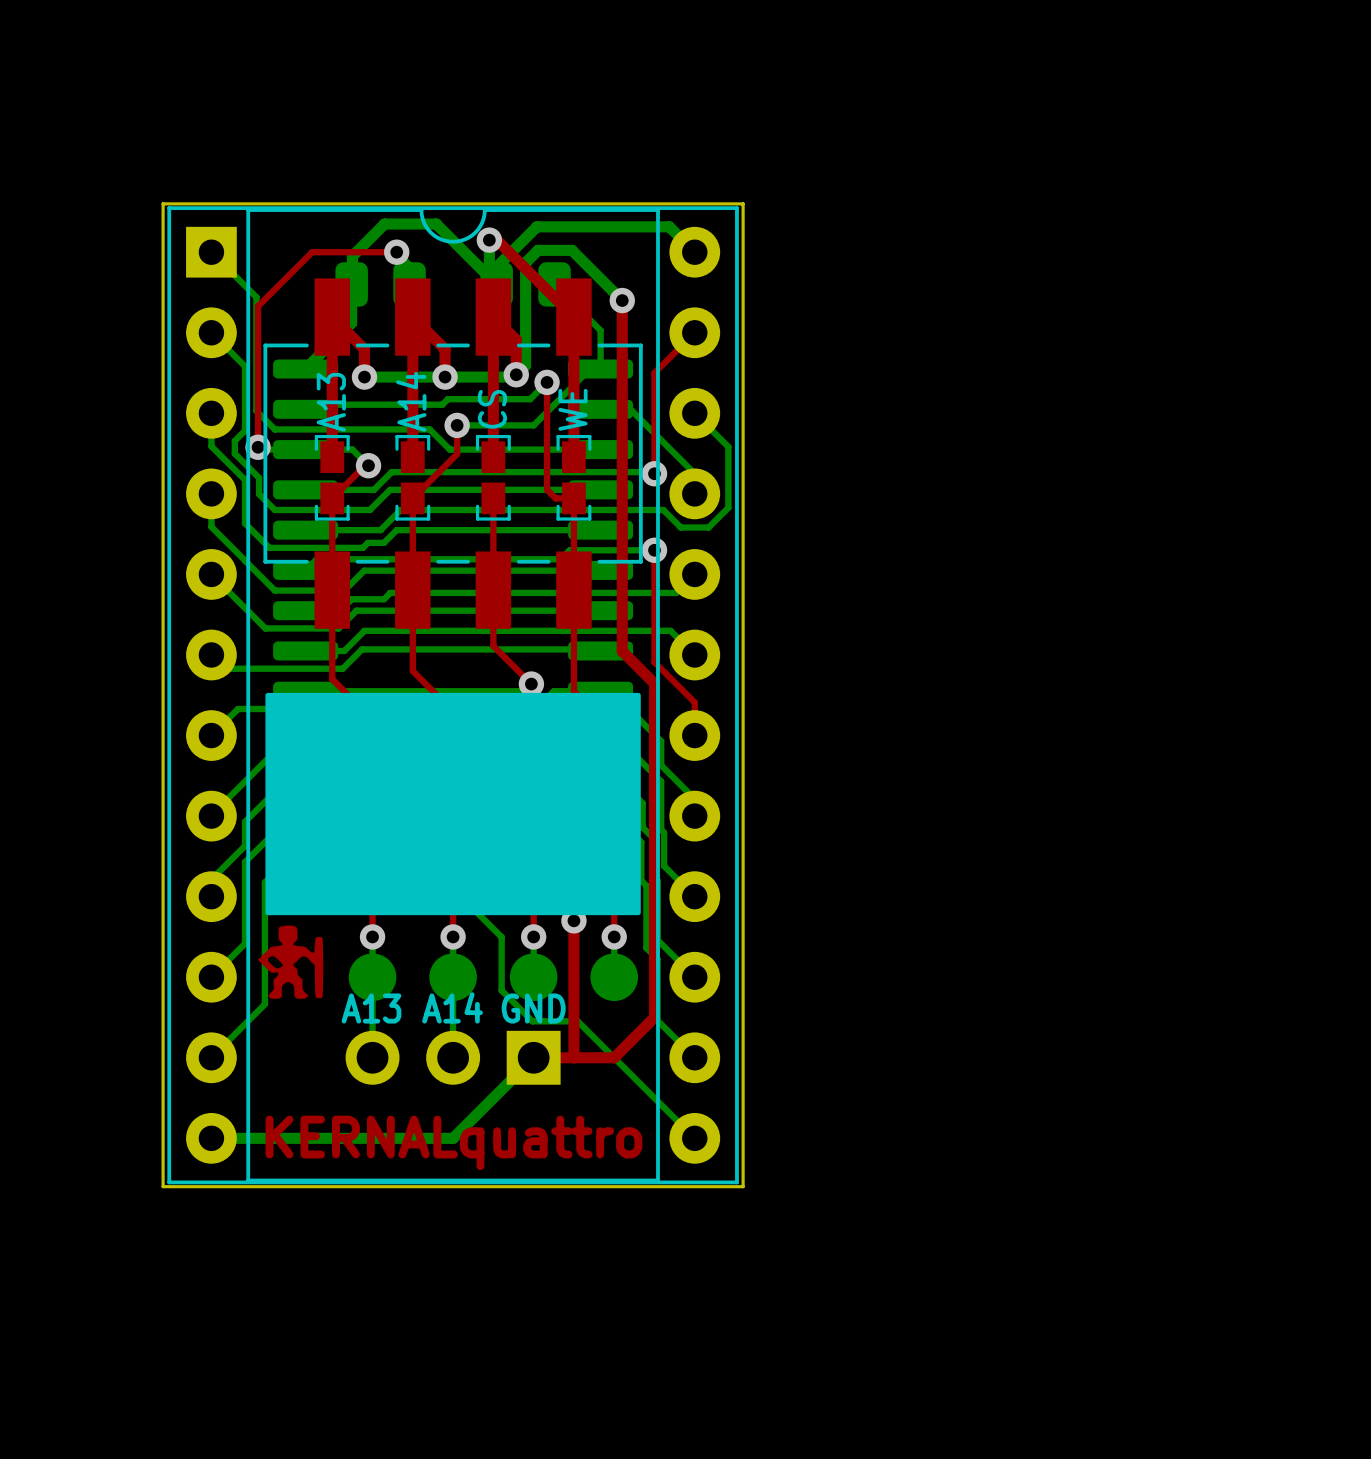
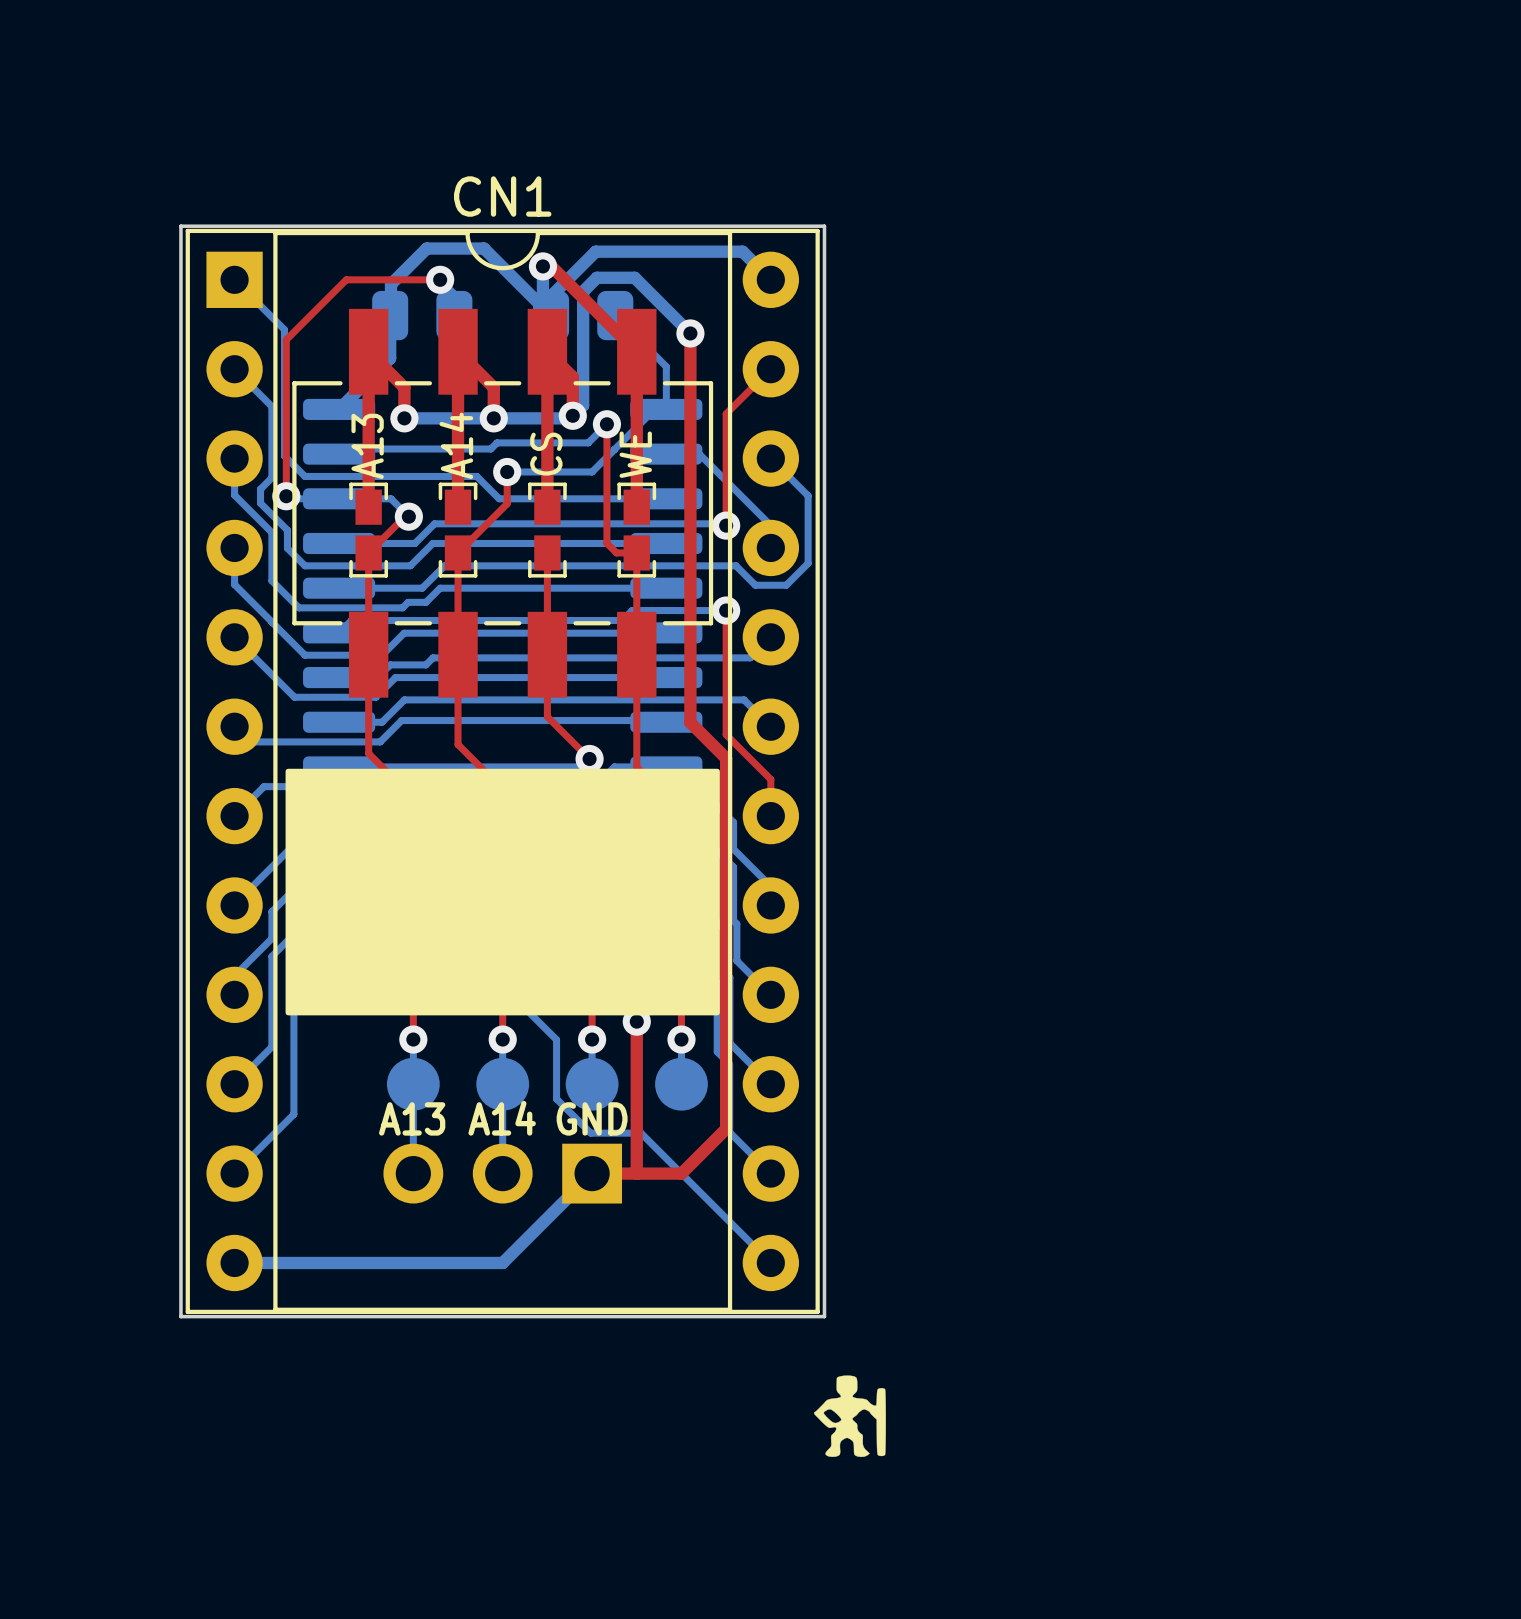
CN1 name: none -> CN1 (502, 196)
drawing shape: [265, 692, 641, 916] -> [285, 768, 720, 1016]
drawing: [258, 925, 324, 1000] -> none
text: KERNALquattro (453, 1142) -> none
drawing: none -> [814, 1375, 886, 1458]

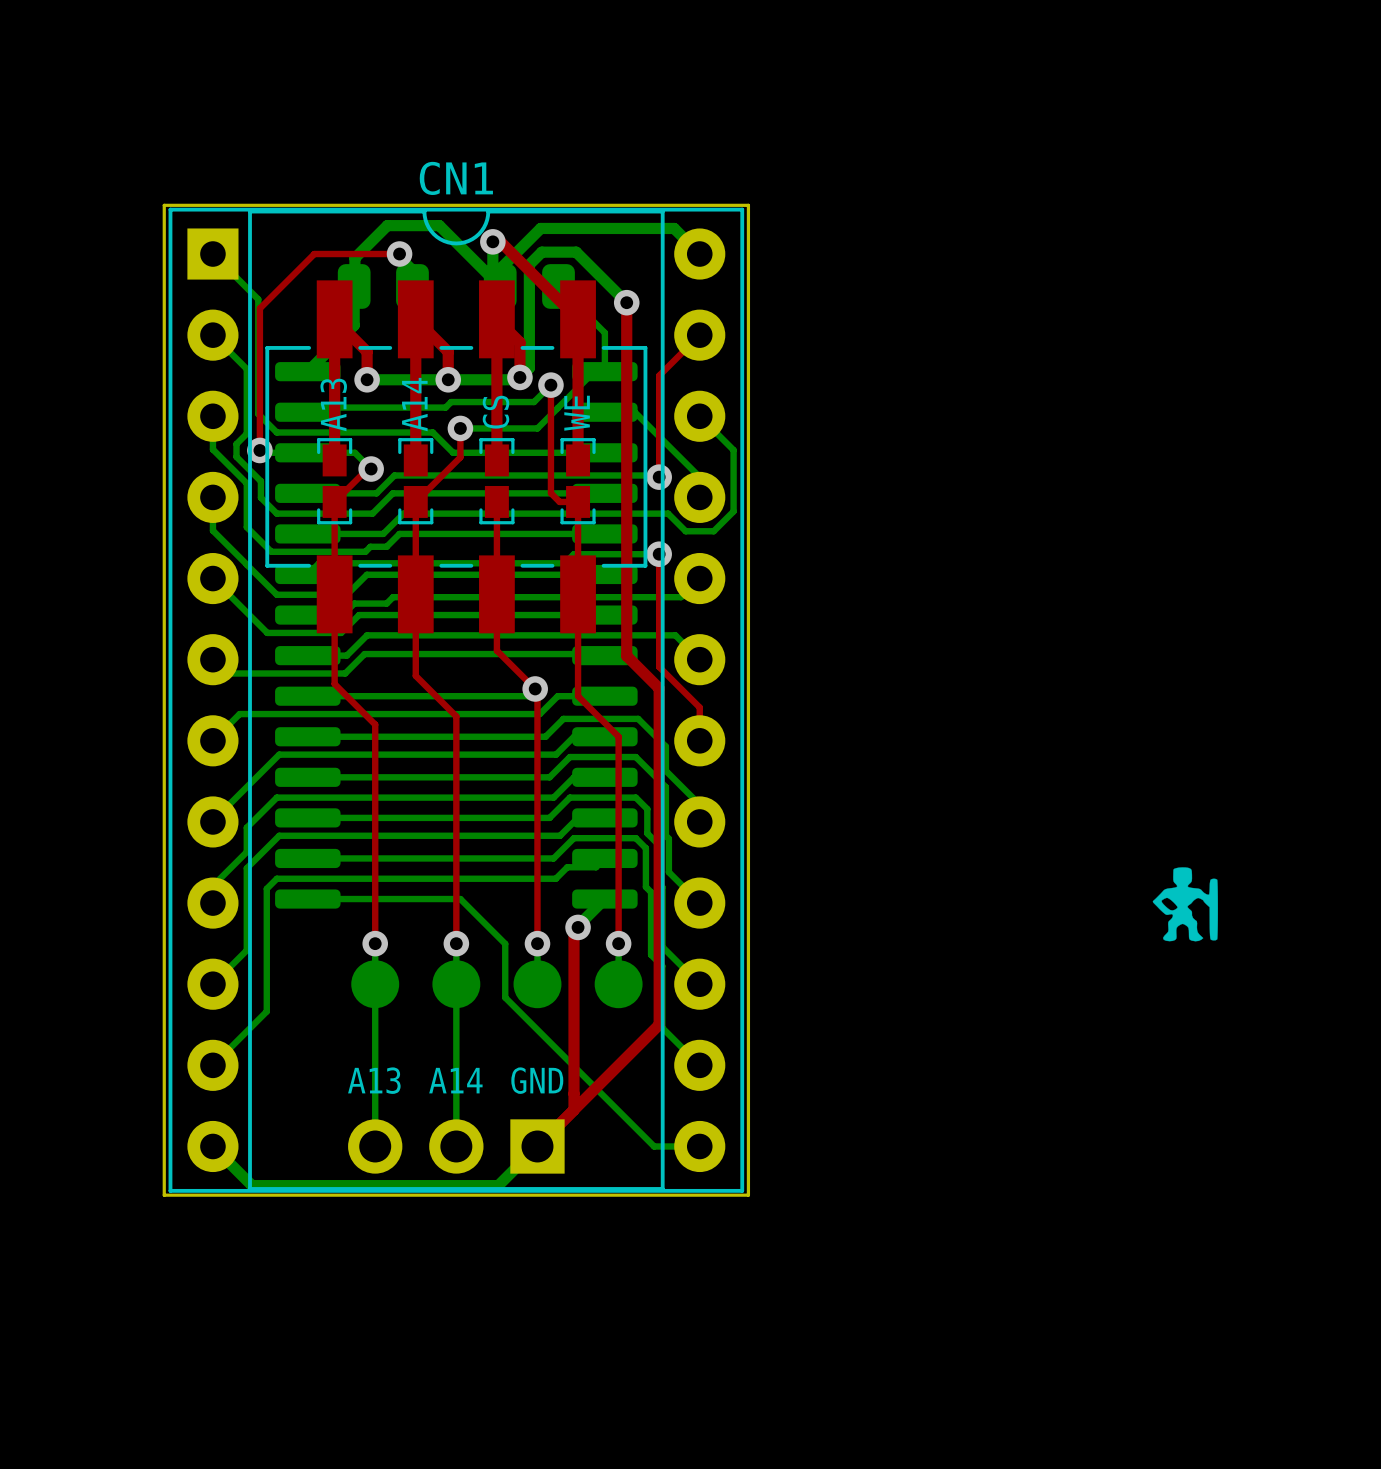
drawing: [285, 768, 720, 1016] -> none
top track: (636, 1021) (636, 1173) -> (578, 927) (573, 931) (573, 1109)
text position: A13 (412, 1118) -> A13 (374, 1080)
text position: A14 (502, 1118) -> A14 (455, 1080)
text position: GND (592, 1118) -> GND (537, 1080)
bottom track: (590, 1133) (641, 1133) (770, 1262) -> (536, 1028) (654, 1146) (699, 1146)
bottom track: none -> (375, 1065) (375, 1146)
bottom track: none -> (456, 1065) (456, 1146)
part position: (502, 1173) -> (456, 1146)
bottom track: (592, 1173) (502, 1262) (234, 1262) -> (537, 1146) (498, 1185) (252, 1185) (212, 1146)
top track: (592, 1173) (681, 1173) -> (537, 1146) (618, 1065)
drawing position: (849, 1416) -> (1185, 904)

